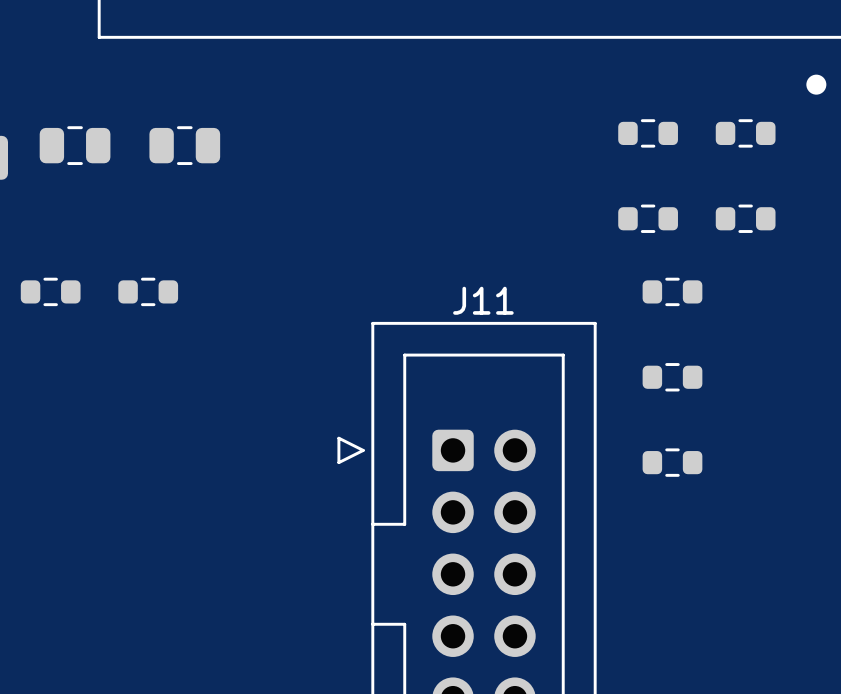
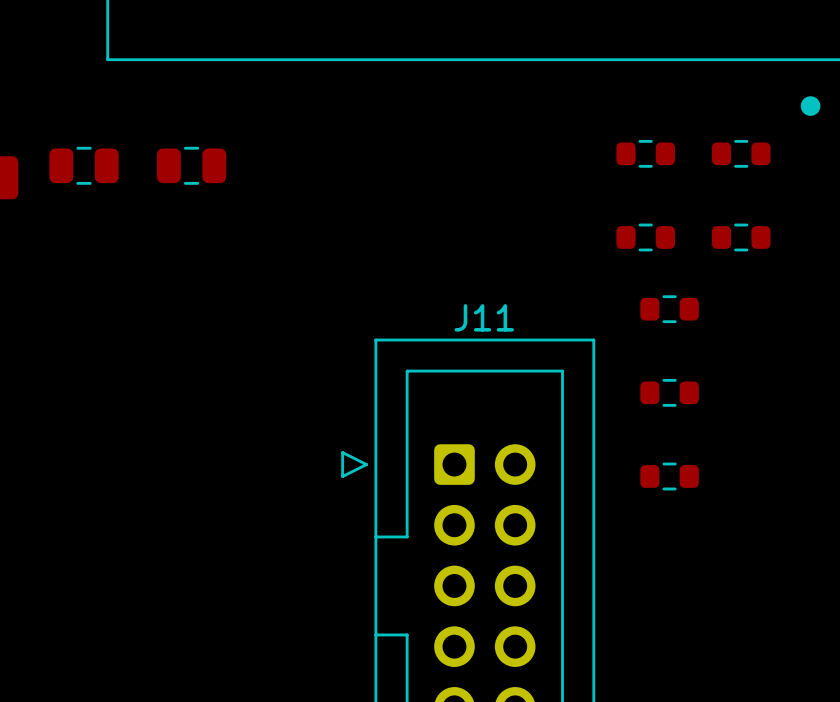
part: (50, 291) -> none
part: (148, 291) -> none

